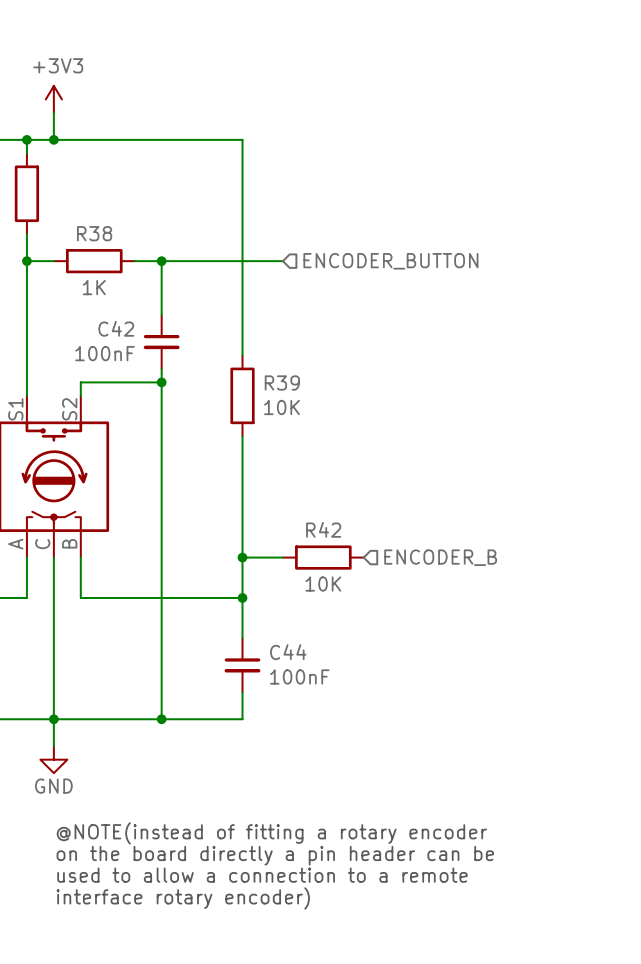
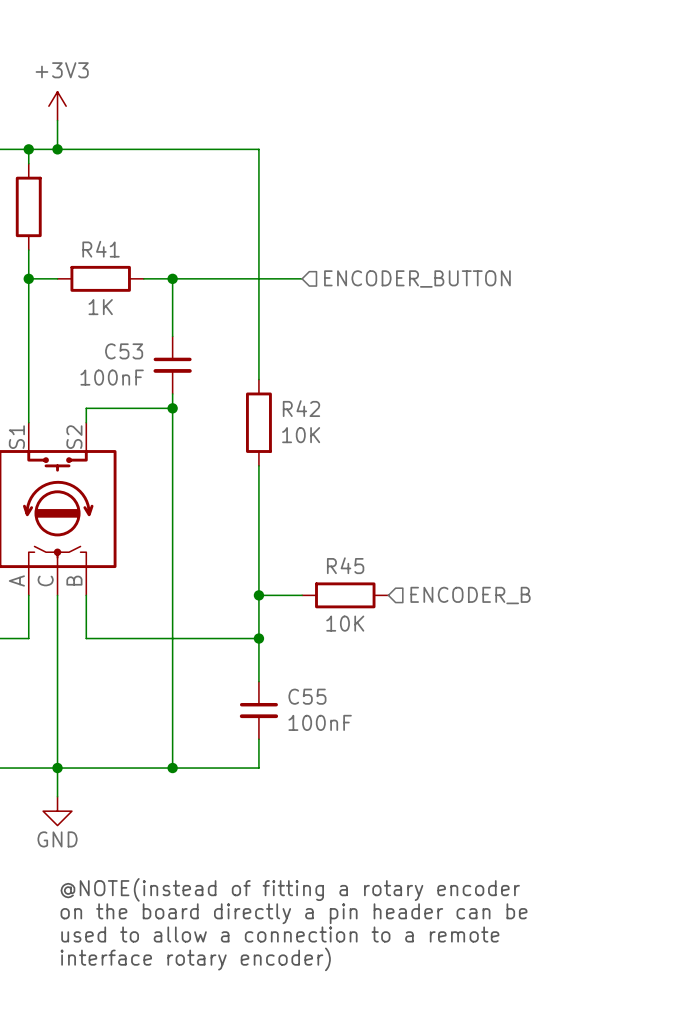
R38 name: R38 (94, 233) -> R41 (101, 249)
C42 name: C42 (116, 328) -> C53 (124, 351)
R39 name: R39 (282, 382) -> R42 (301, 408)
R42 name: R42 (323, 529) -> R45 (345, 565)
C44 name: C44 (288, 652) -> C55 (307, 696)

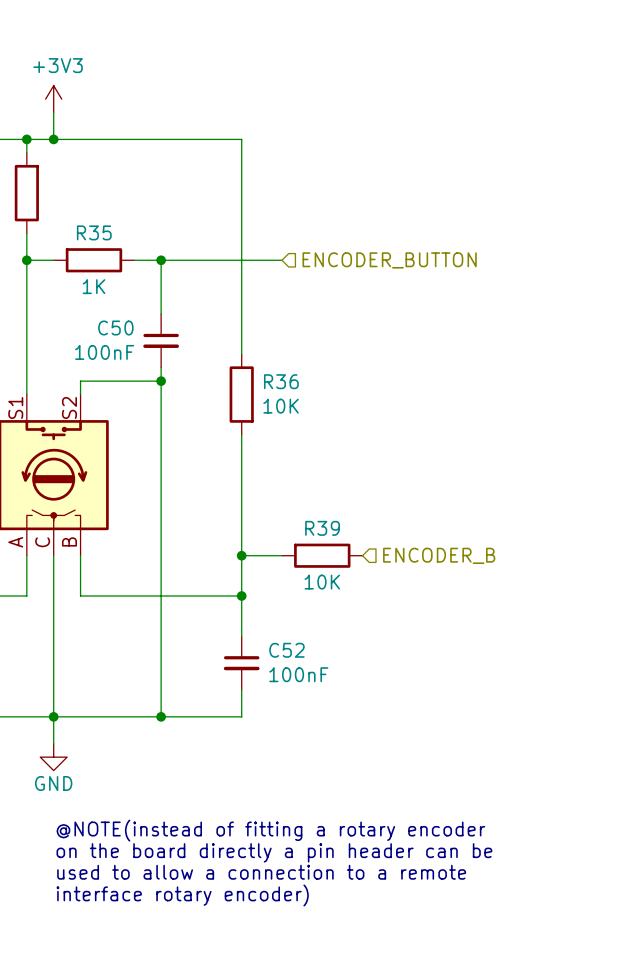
R41 name: R41 (101, 249) -> R35 (94, 232)
C53 name: C53 (124, 351) -> C50 (115, 327)
R42 name: R42 (301, 408) -> R36 (281, 381)
R45 name: R45 (345, 565) -> R39 (322, 528)
C55 name: C55 (307, 696) -> C52 (286, 650)

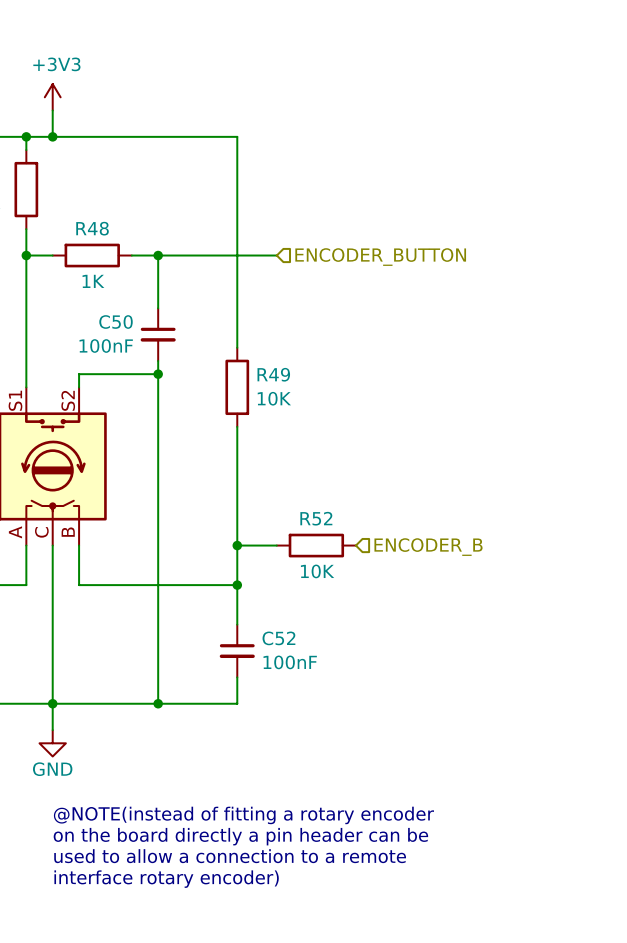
R35 name: R35 (94, 232) -> R48 (92, 228)
R36 name: R36 (281, 381) -> R49 (273, 374)
R39 name: R39 (322, 528) -> R52 (316, 518)

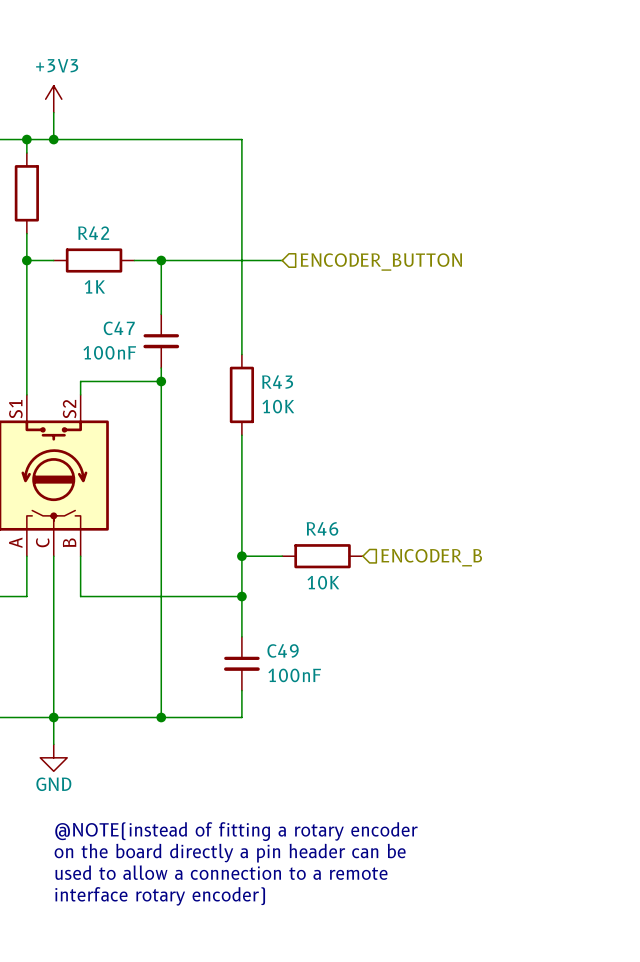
R48 name: R48 (92, 228) -> R42 (93, 233)
C50 name: C50 (116, 322) -> C47 (119, 328)
R49 name: R49 (273, 374) -> R43 (277, 382)
R52 name: R52 (316, 518) -> R46 (322, 528)
C52 name: C52 (278, 638) -> C49 (283, 650)

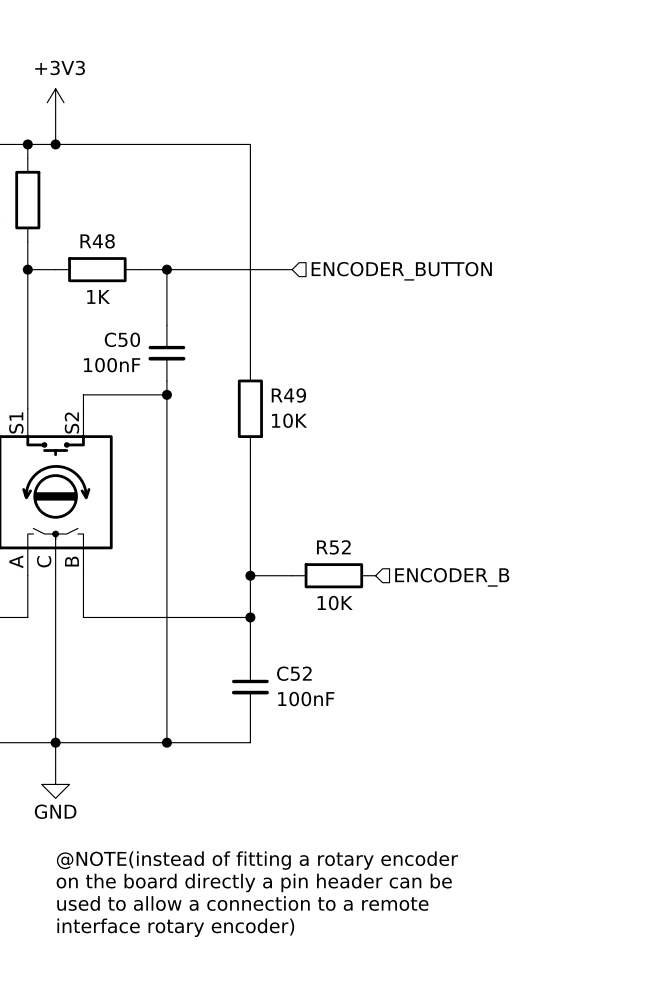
R42 name: R42 (93, 233) -> R48 (97, 241)
C47 name: C47 (119, 328) -> C50 (122, 339)
R43 name: R43 (277, 382) -> R49 (288, 395)
R46 name: R46 (322, 528) -> R52 (333, 547)
C49 name: C49 (283, 650) -> C52 (294, 673)

